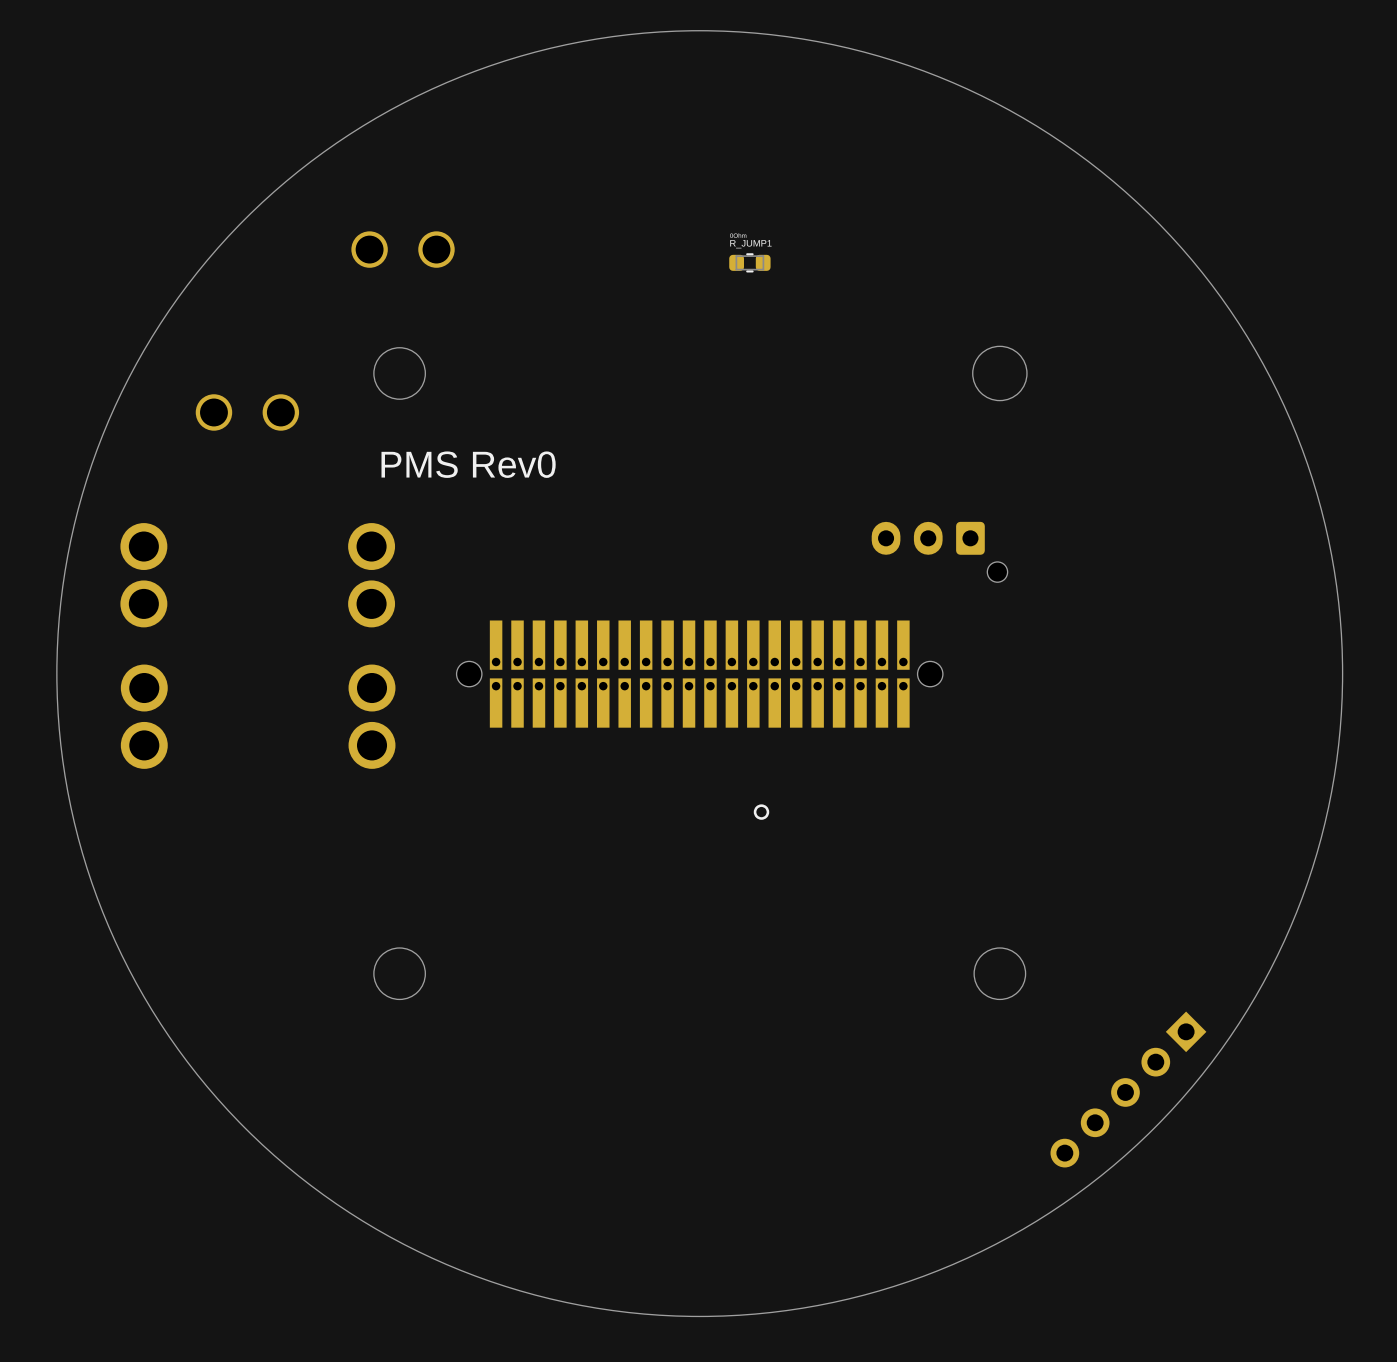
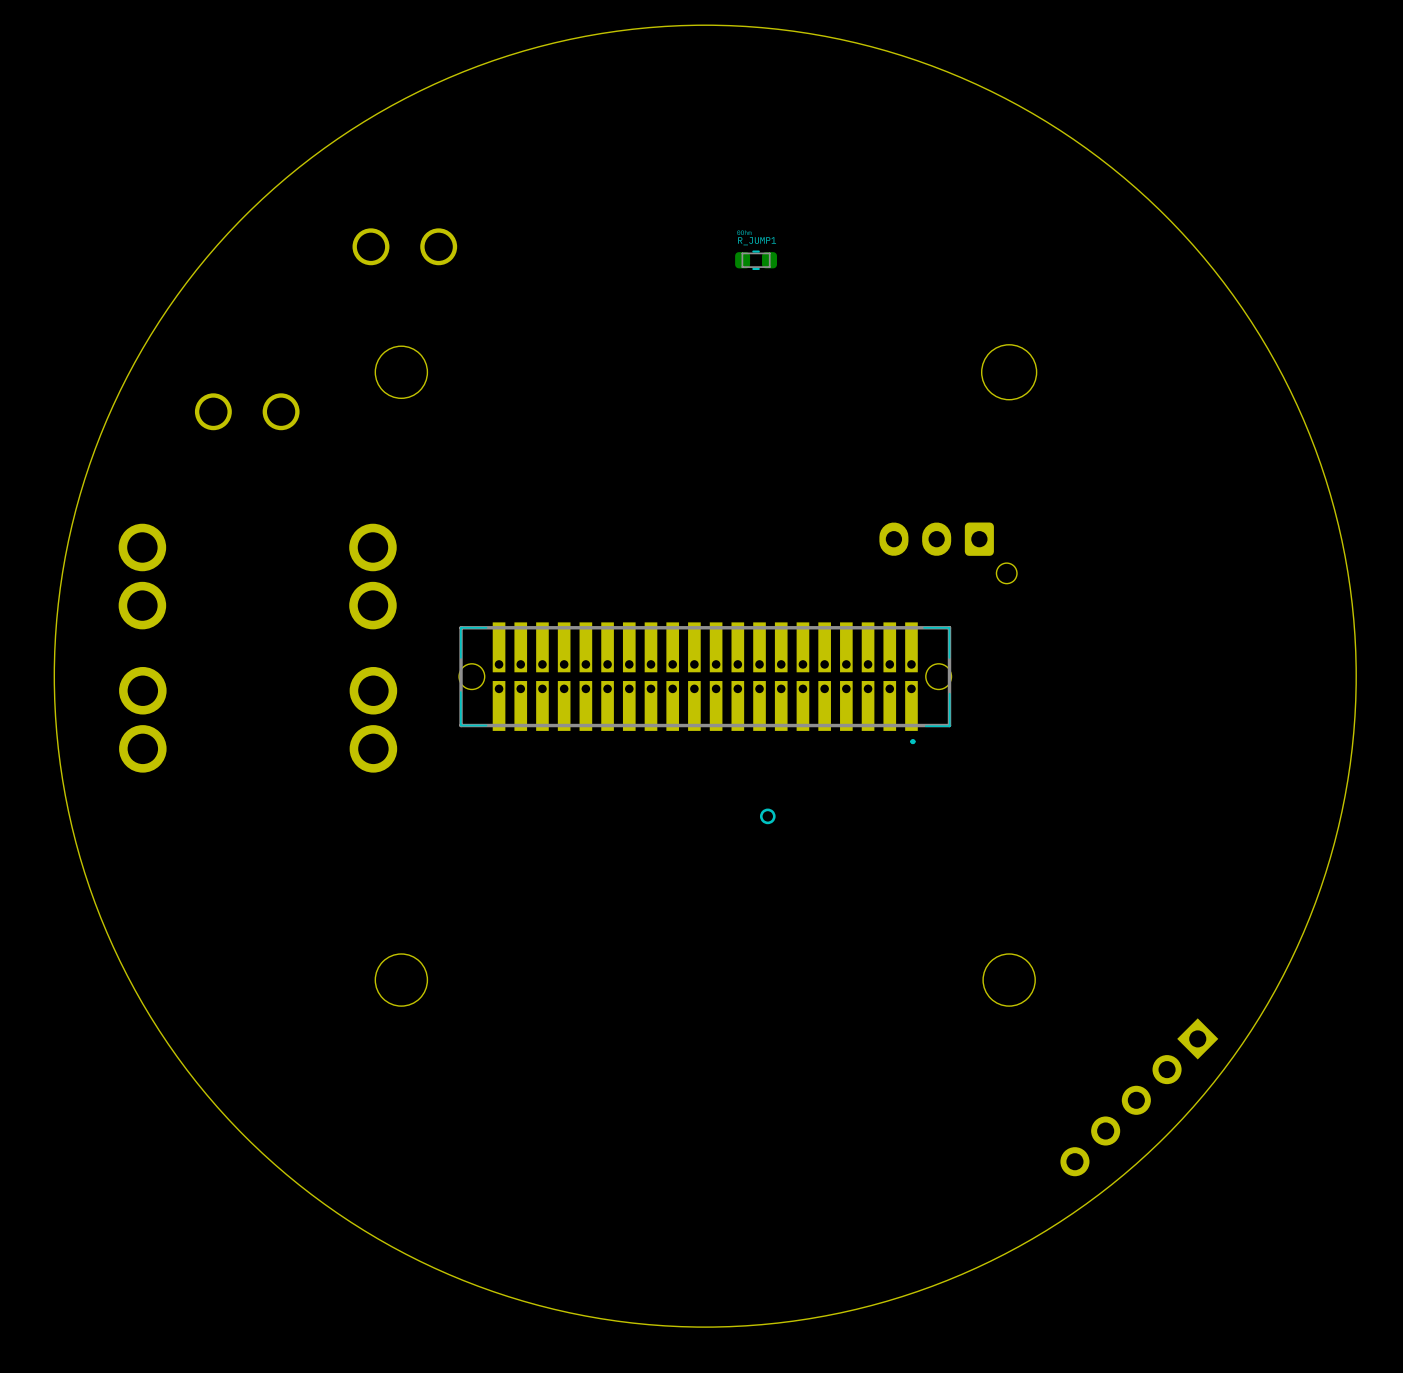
text: PMS Rev0 (468, 464) -> none
part footprint: [456, 620, 943, 728] -> [459, 622, 952, 745]

